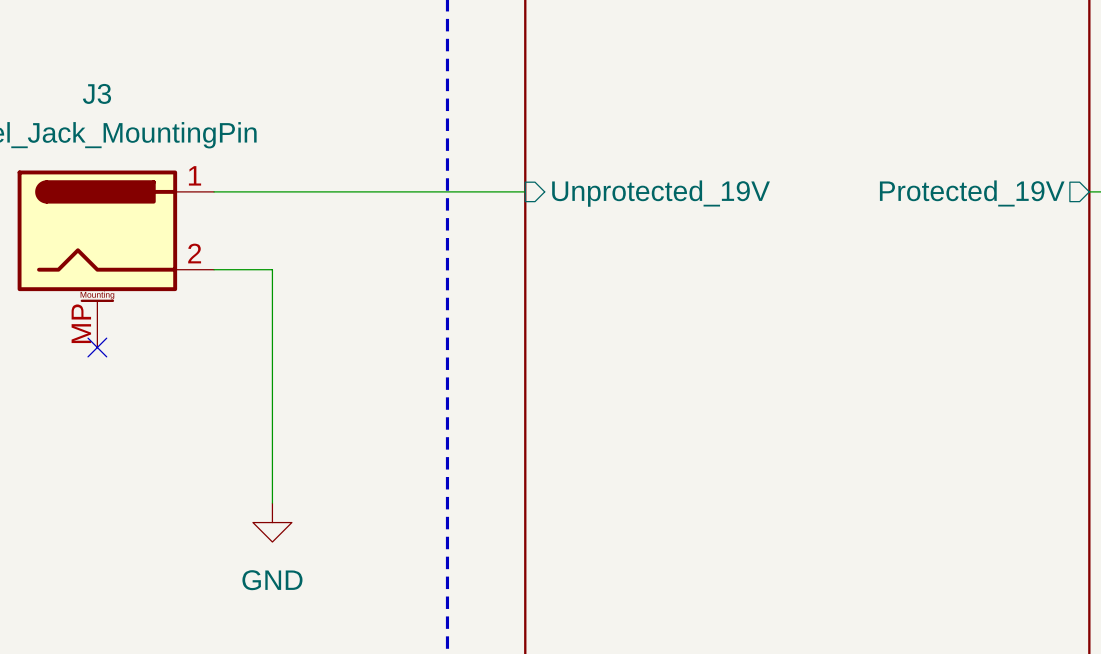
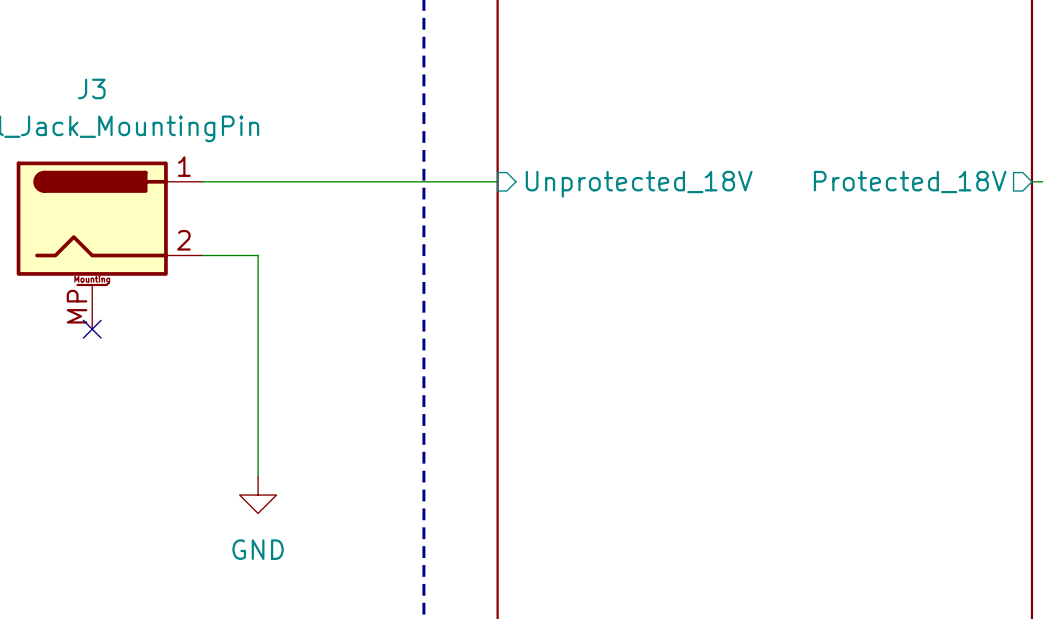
sheet pin: Unprotected_19V (661, 193) -> Unprotected_18V (639, 184)
sheet pin: Protected_19V (972, 193) -> Protected_18V (910, 181)

